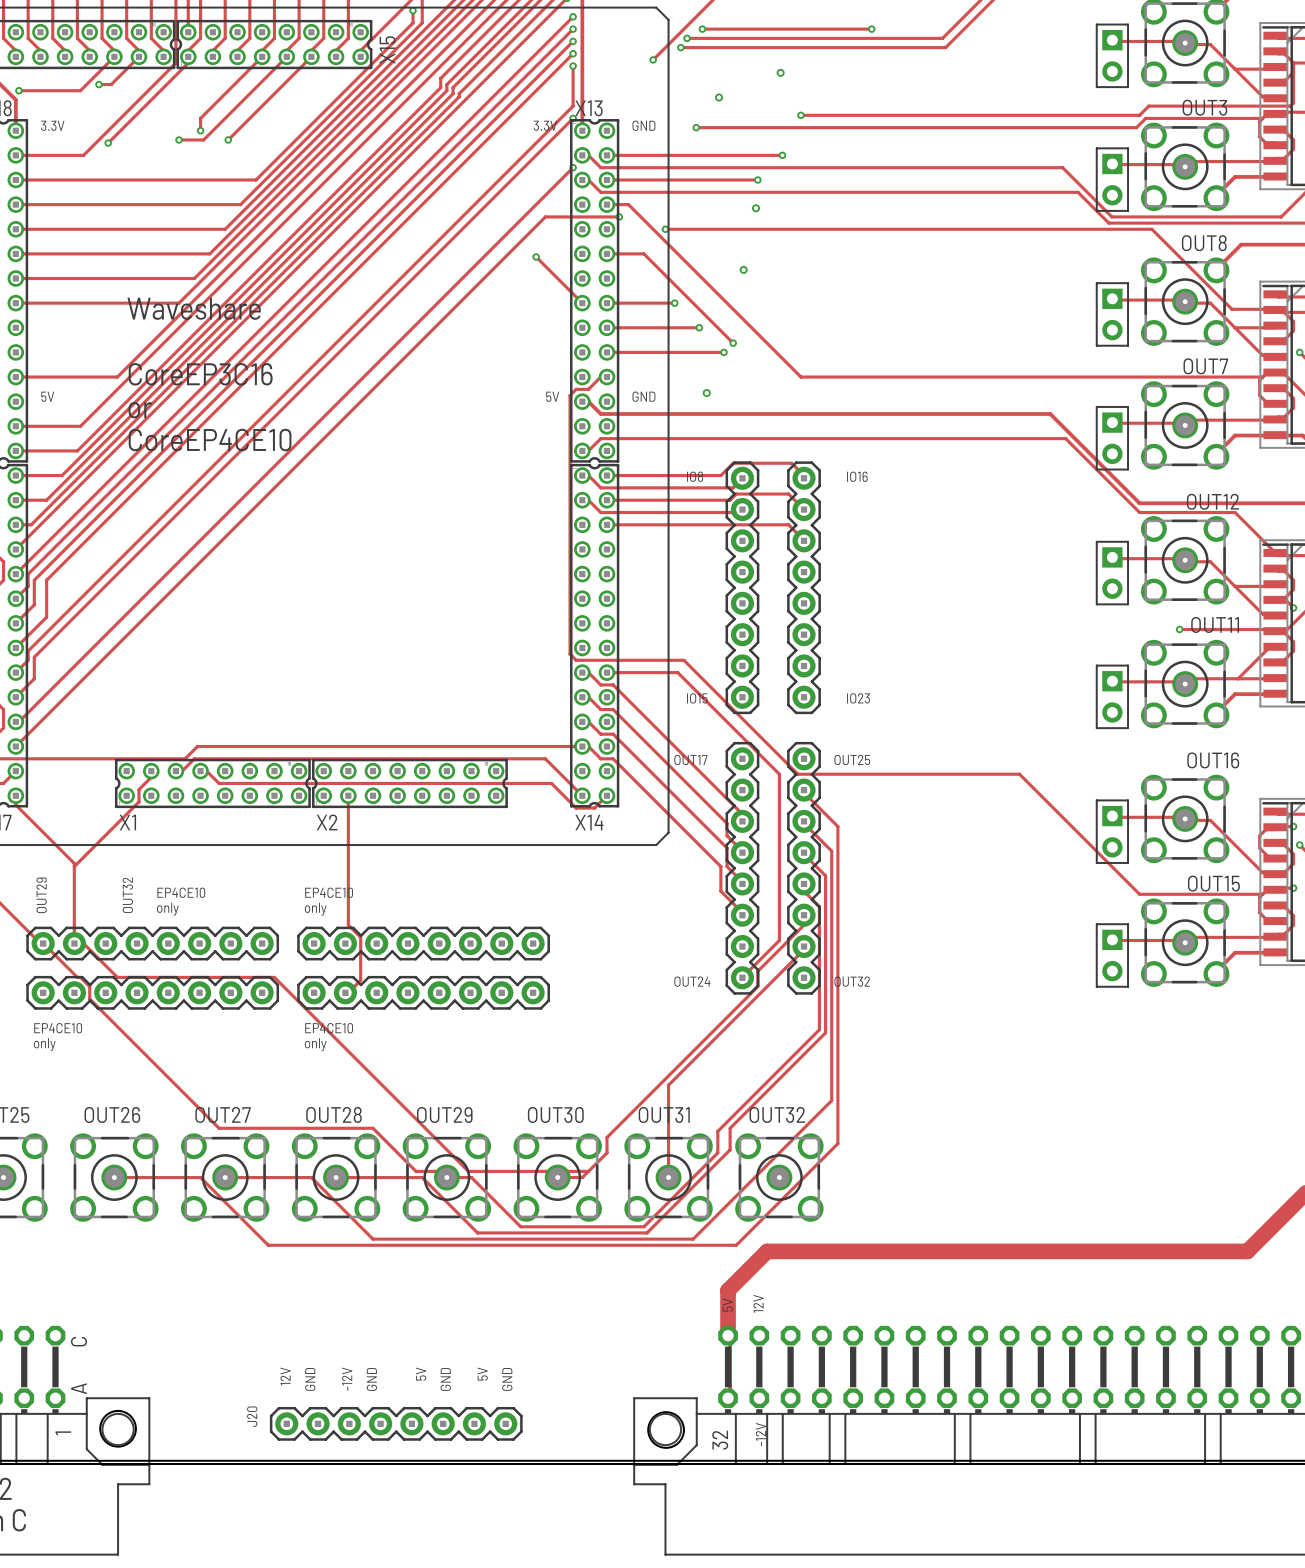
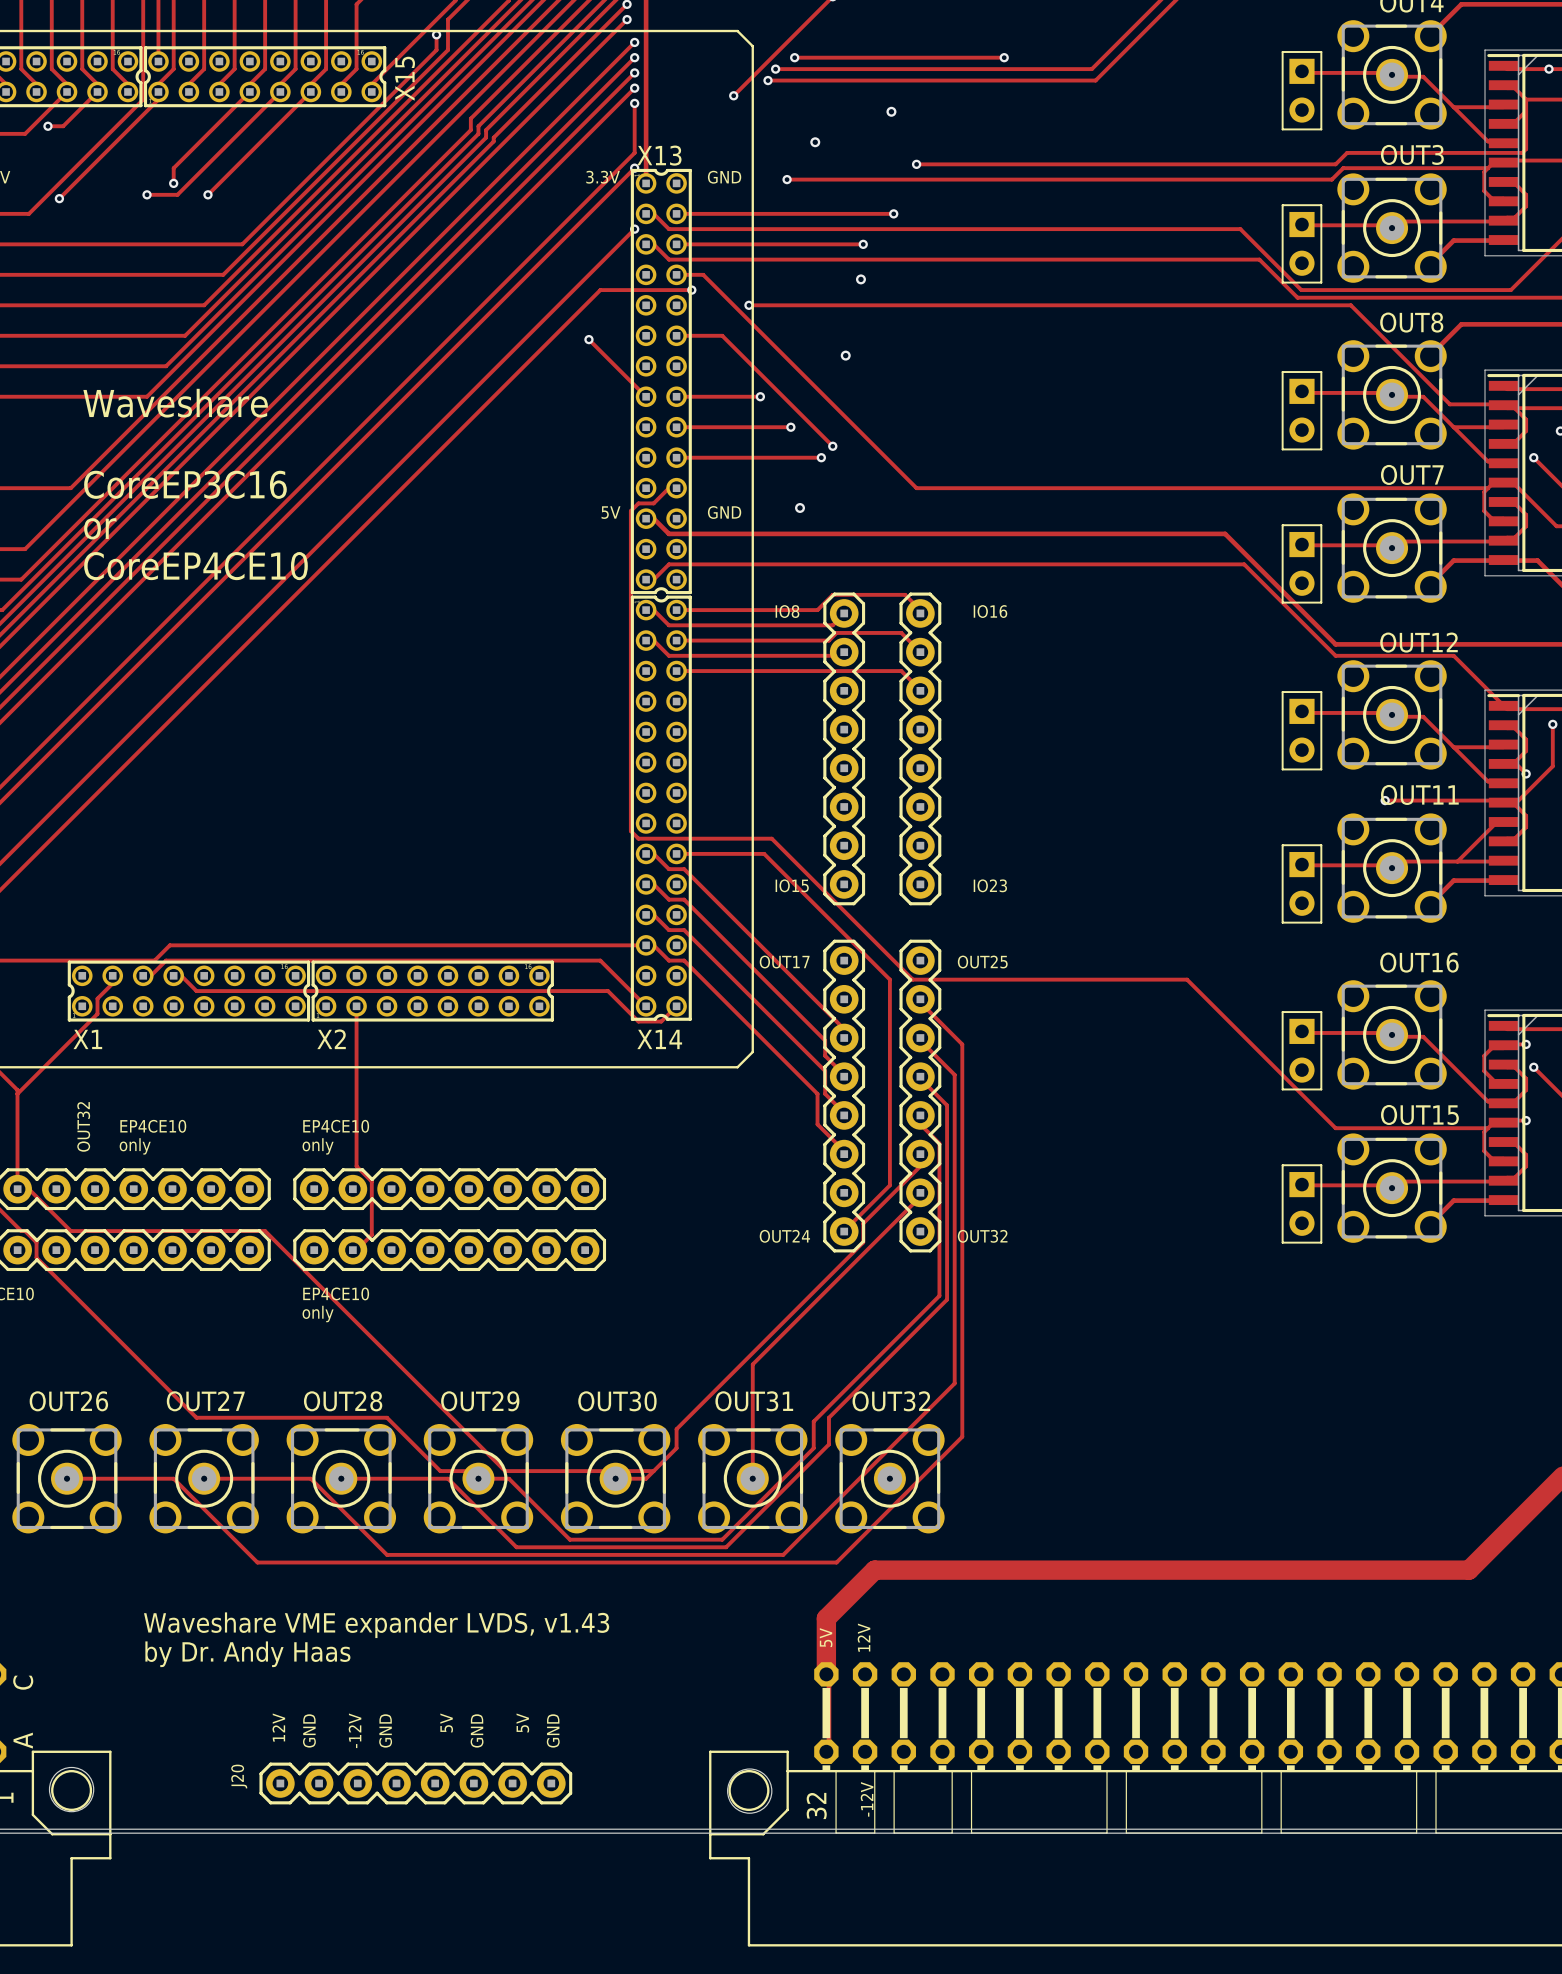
text: none -> Waveshare VME expander LVDS, v1.43 (376, 1625)
text: none -> by Dr. Andy Haas (247, 1654)

